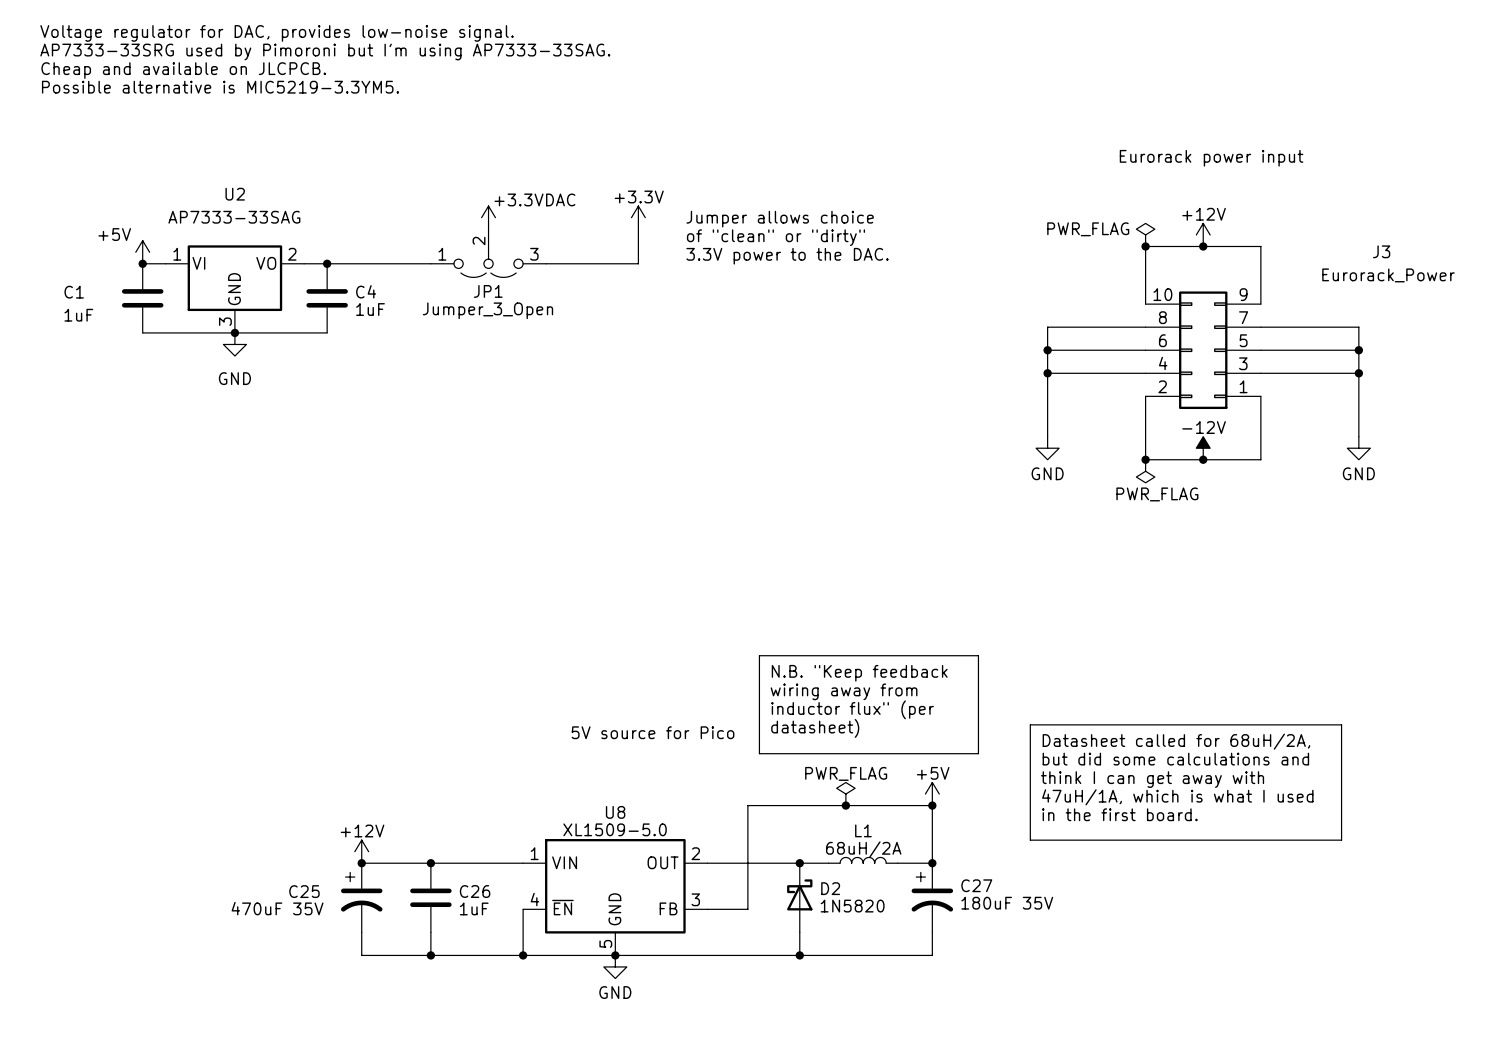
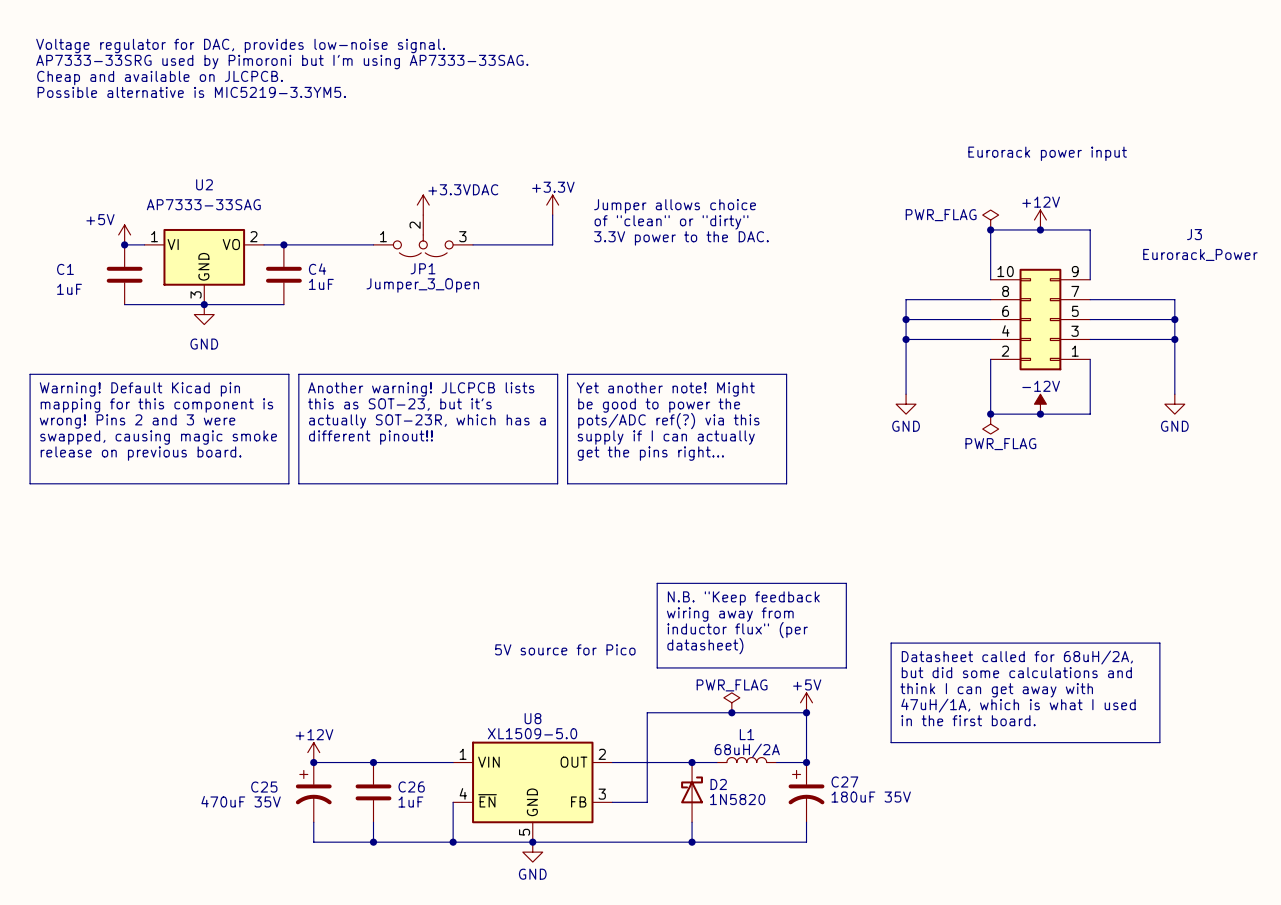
line: none -> (30, 374) (288, 374) (288, 483) (30, 483) (30, 374)
line: none -> (298, 374) (557, 374) (557, 483) (298, 483) (298, 374)
line: none -> (567, 374) (786, 374) (786, 483) (567, 483) (567, 374)
text: none -> Warning! Default Kicad pin (139, 389)
text: none -> Another warning! JLCPCB lists (421, 389)
text: none -> Yet another note! Might (665, 389)
text: none -> this as SOT-23, but it's (399, 404)
text: none -> mapping for this component is (156, 405)
text: none -> be good to power the (659, 405)
text: none -> pots/ADC ref(?) via this (668, 421)
text: none -> wrong! Pins 2 and 3 were (137, 421)
text: none -> actually SOT-23R, which has a (427, 421)
text: none -> swapped, causing magic smoke (158, 437)
text: none -> different pinout!! (370, 437)
text: none -> supply if I can actually (666, 437)
text: none -> release on previous board. (141, 453)
text: none -> get the pins right... (650, 453)

